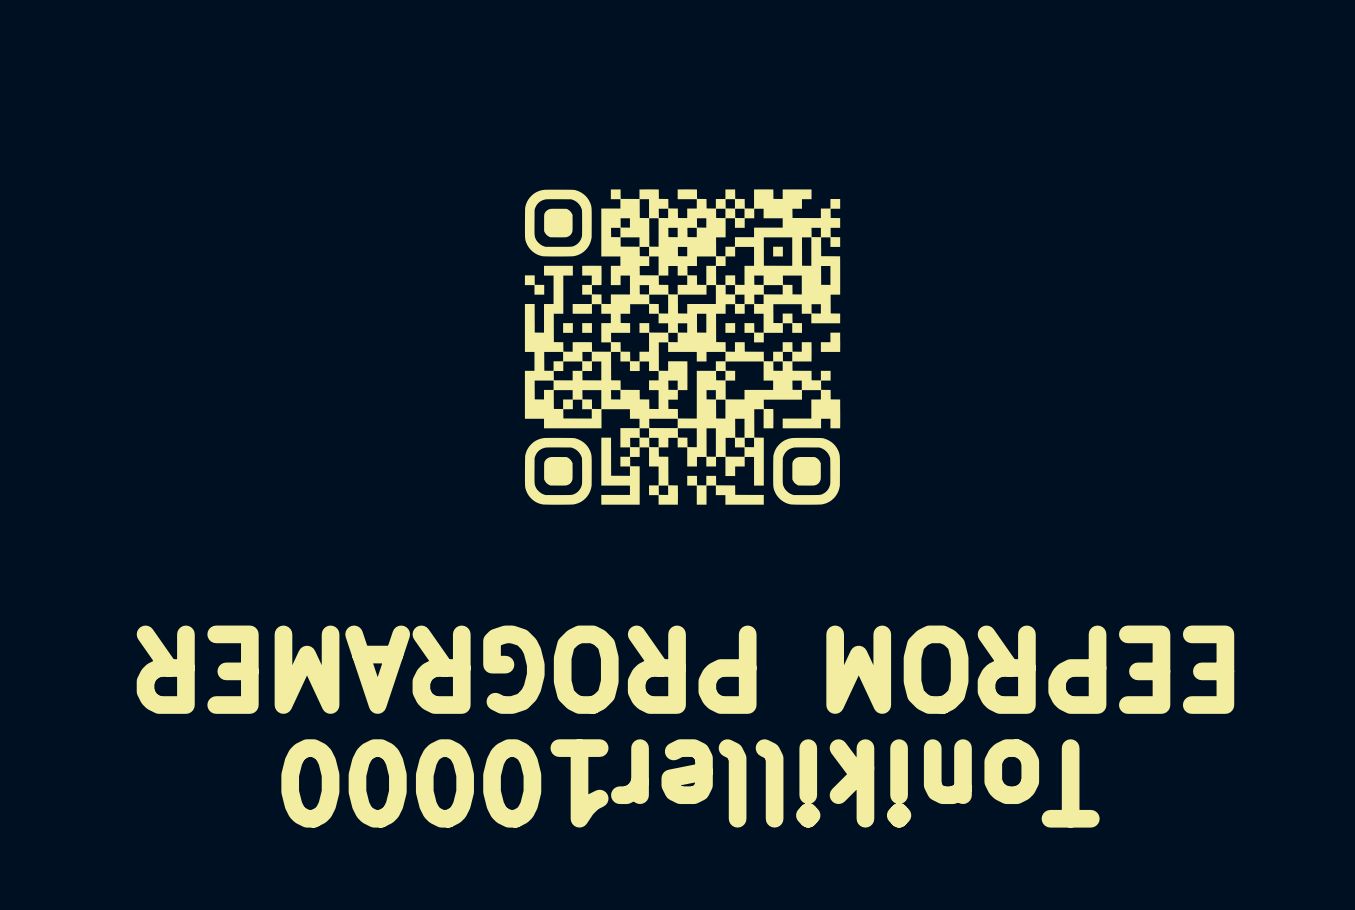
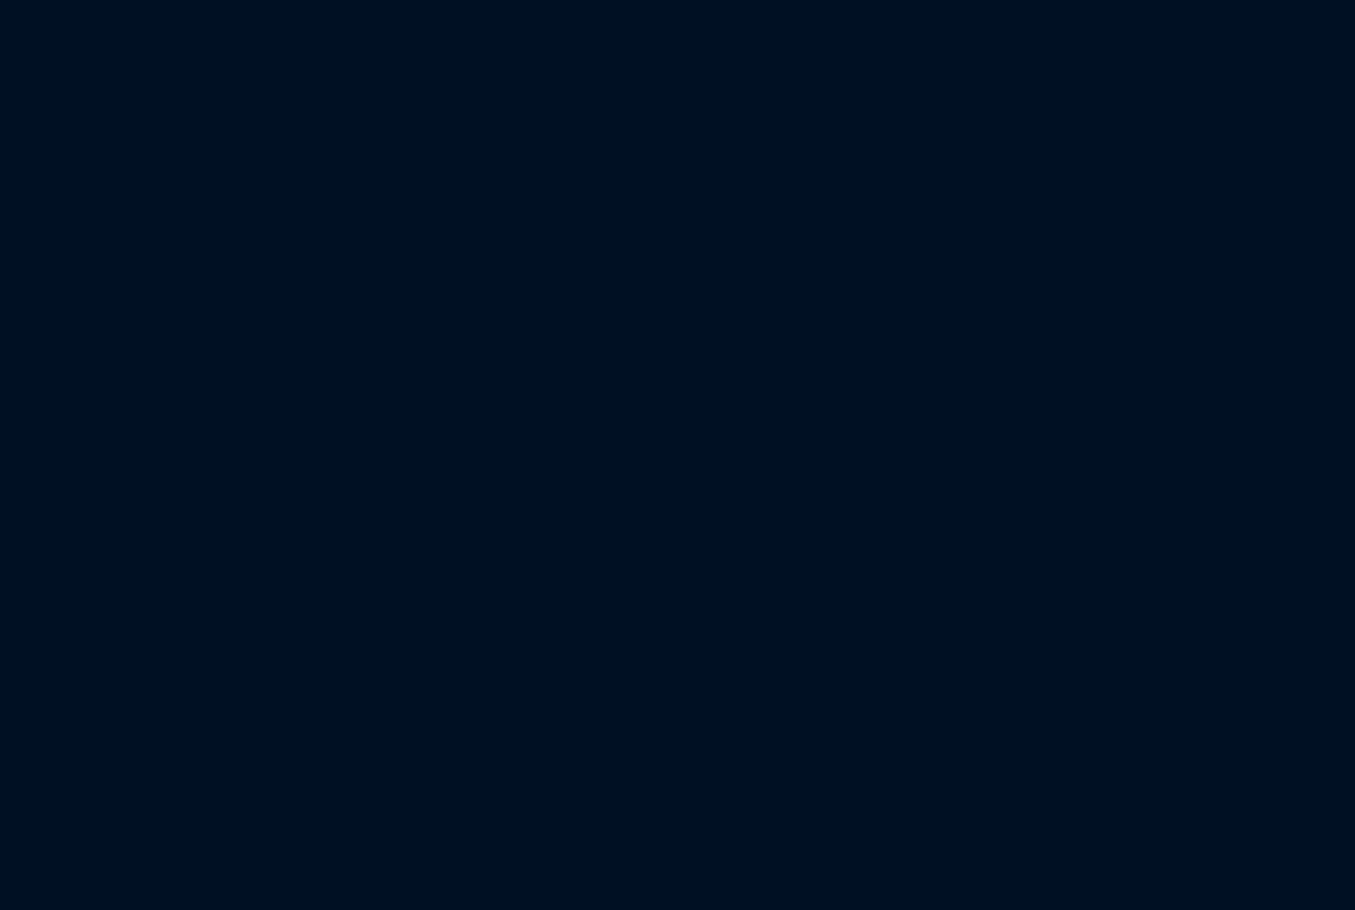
drawing: [524, 189, 841, 505] -> none
text: EEPROM PROGRAMER (685, 669) -> none
text: Tonikiller10000 (690, 783) -> none

